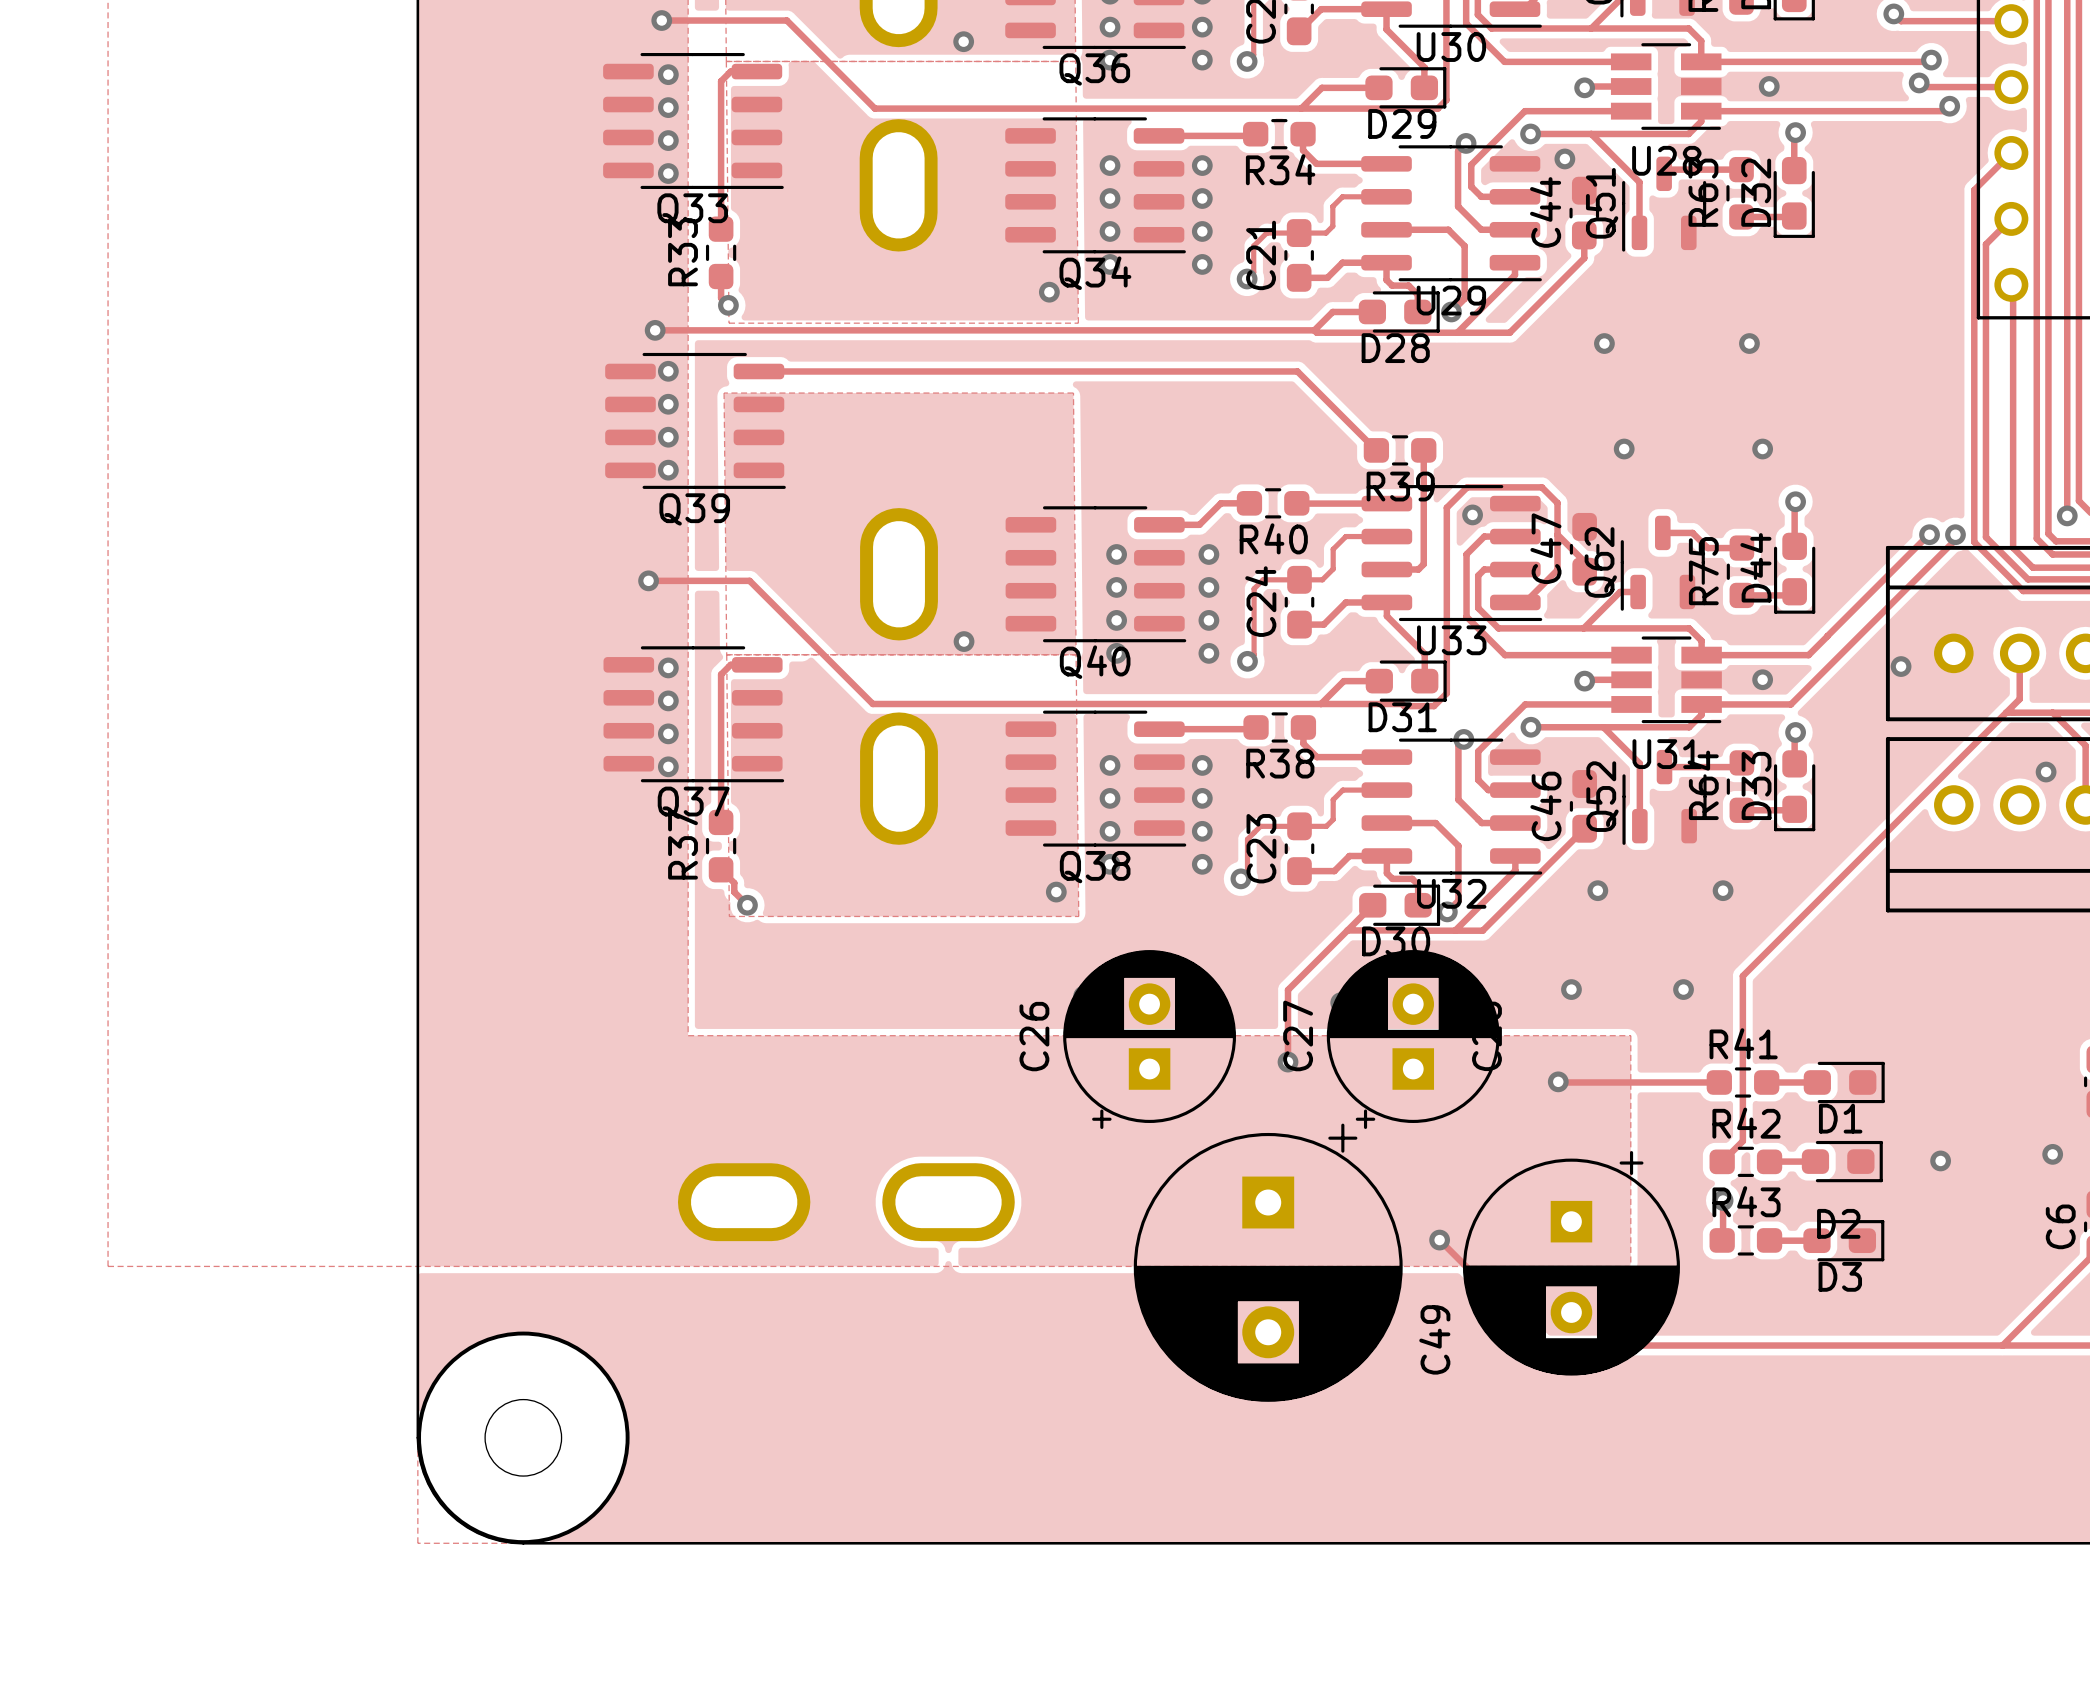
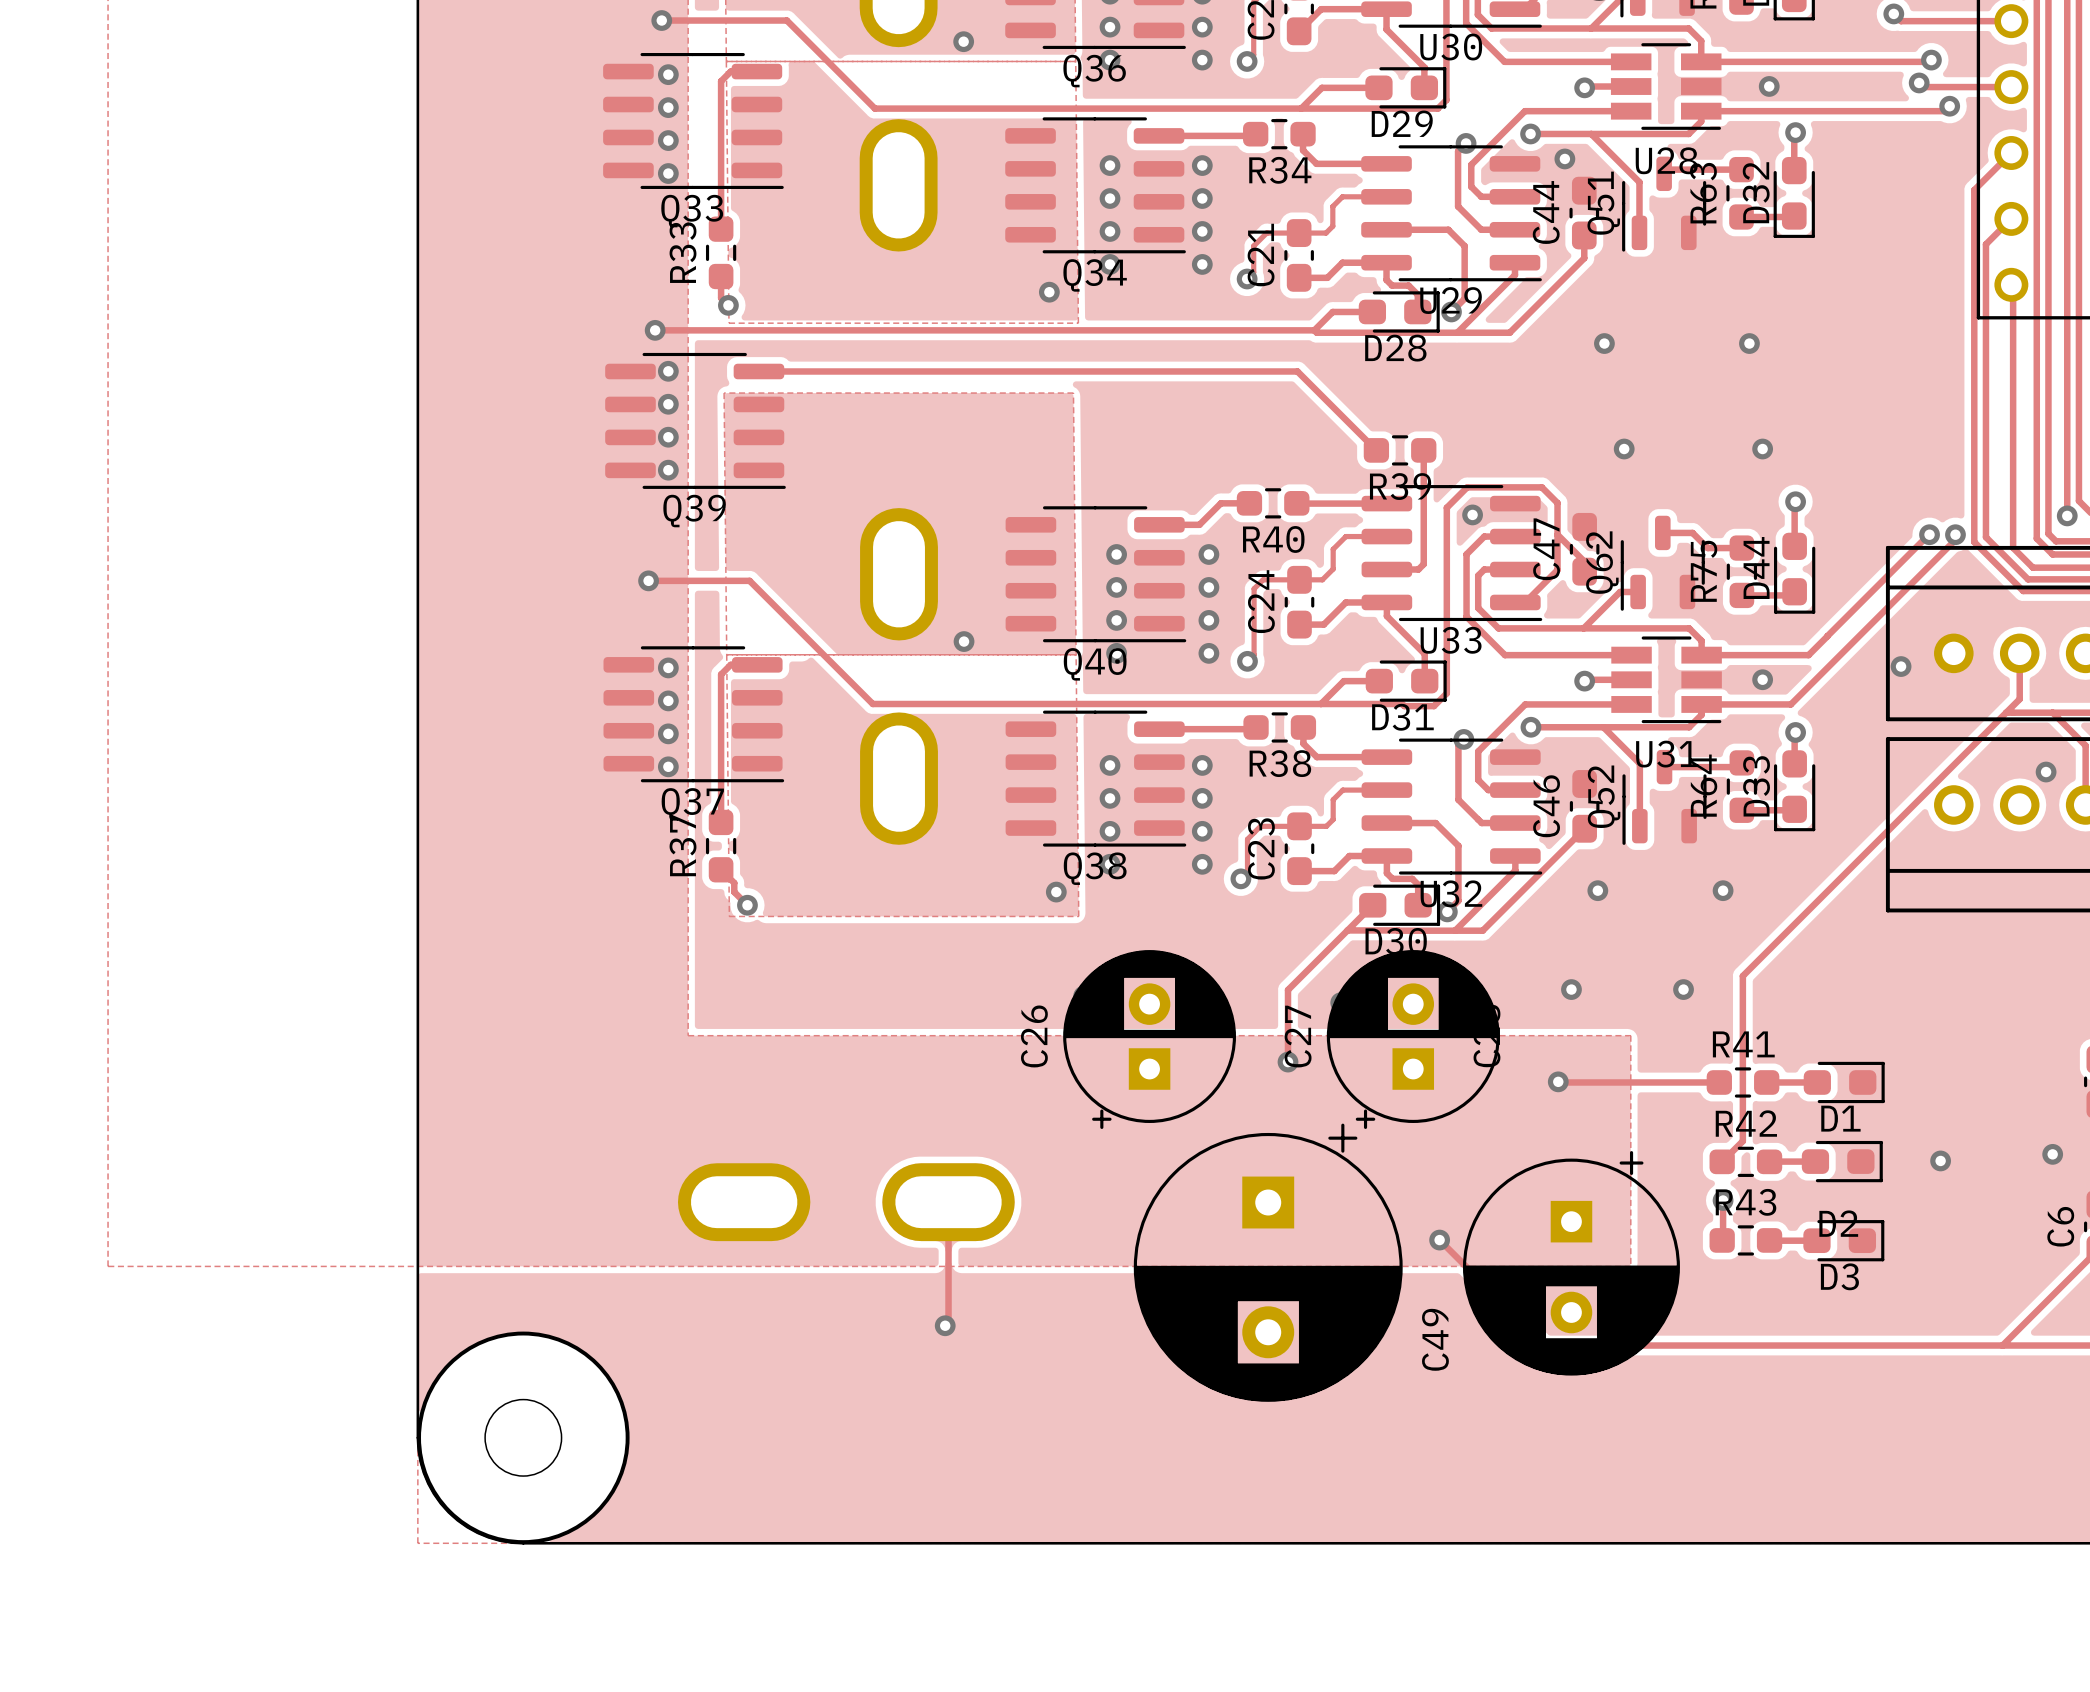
track: none -> (948, 1202) (948, 1322) (945, 1325)
via: none -> (945, 1325)

